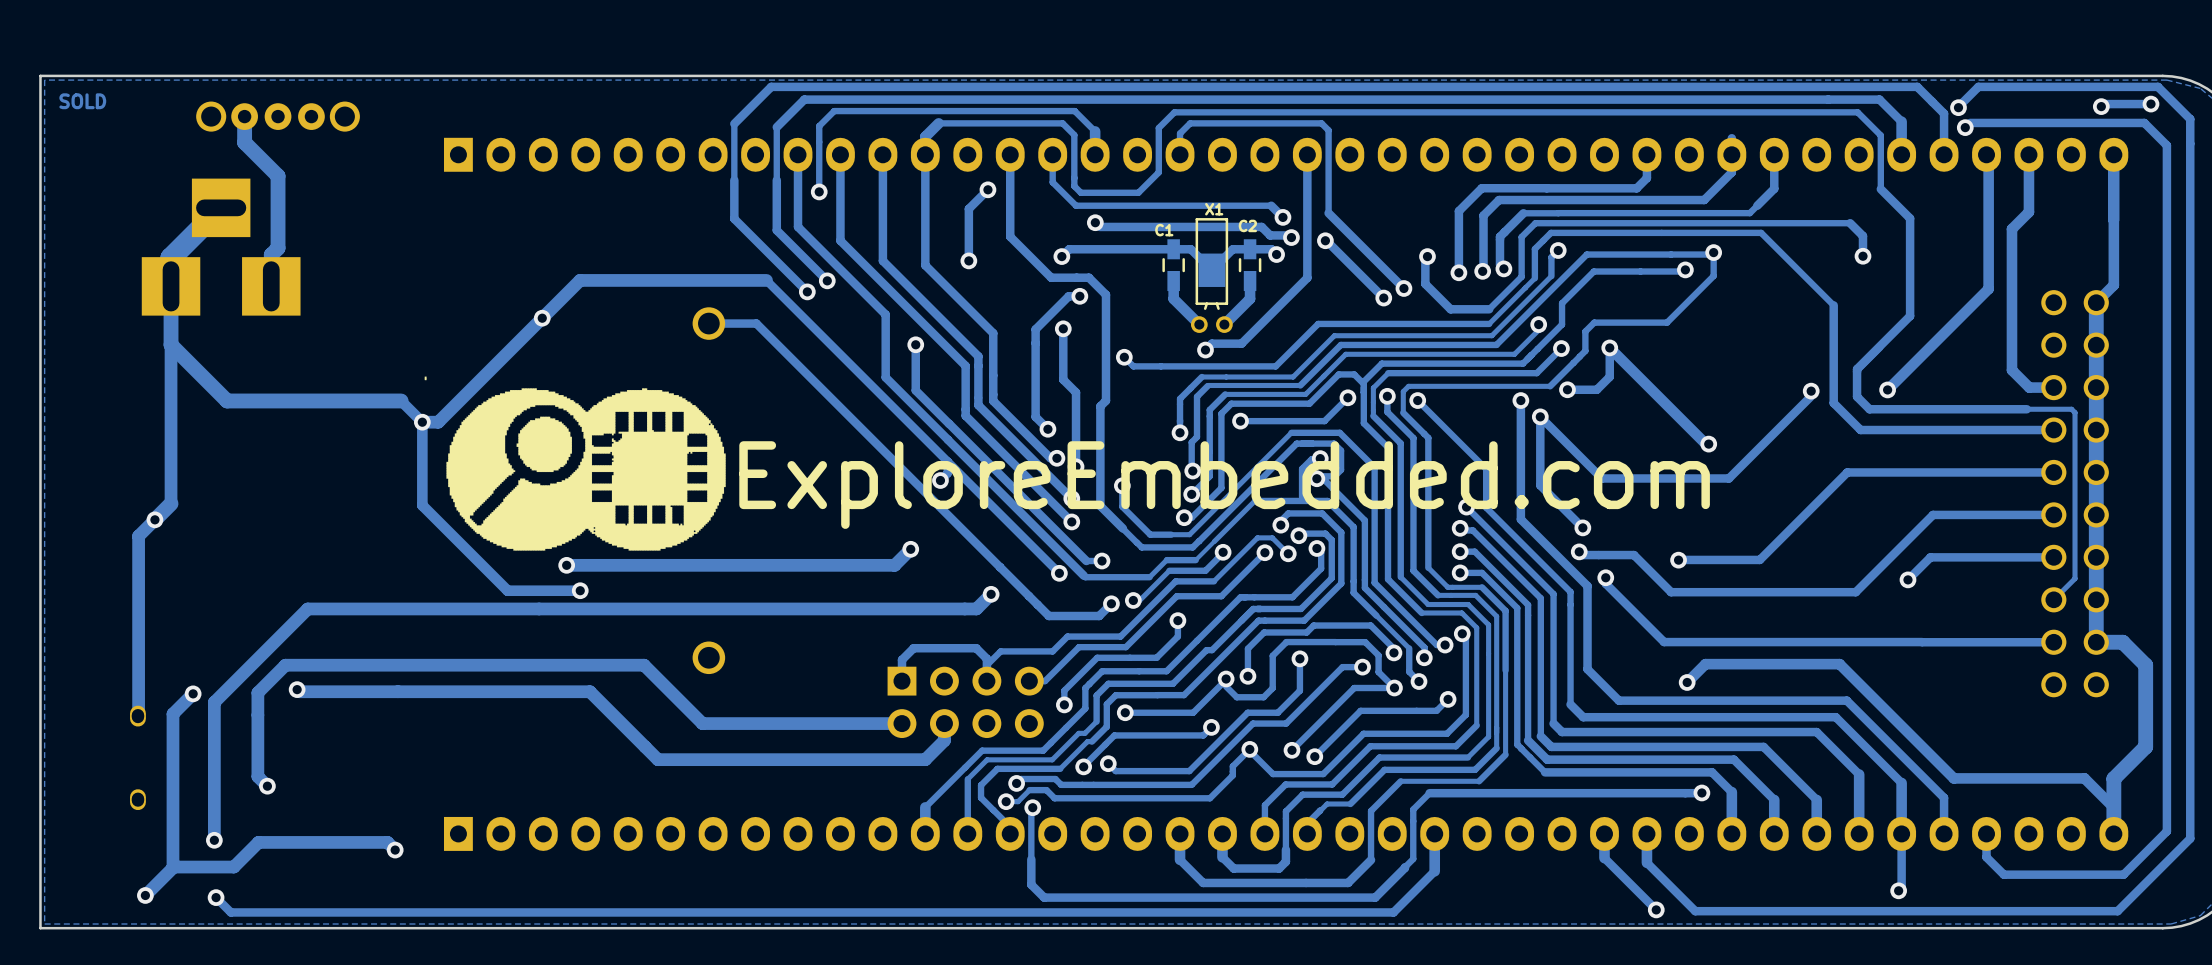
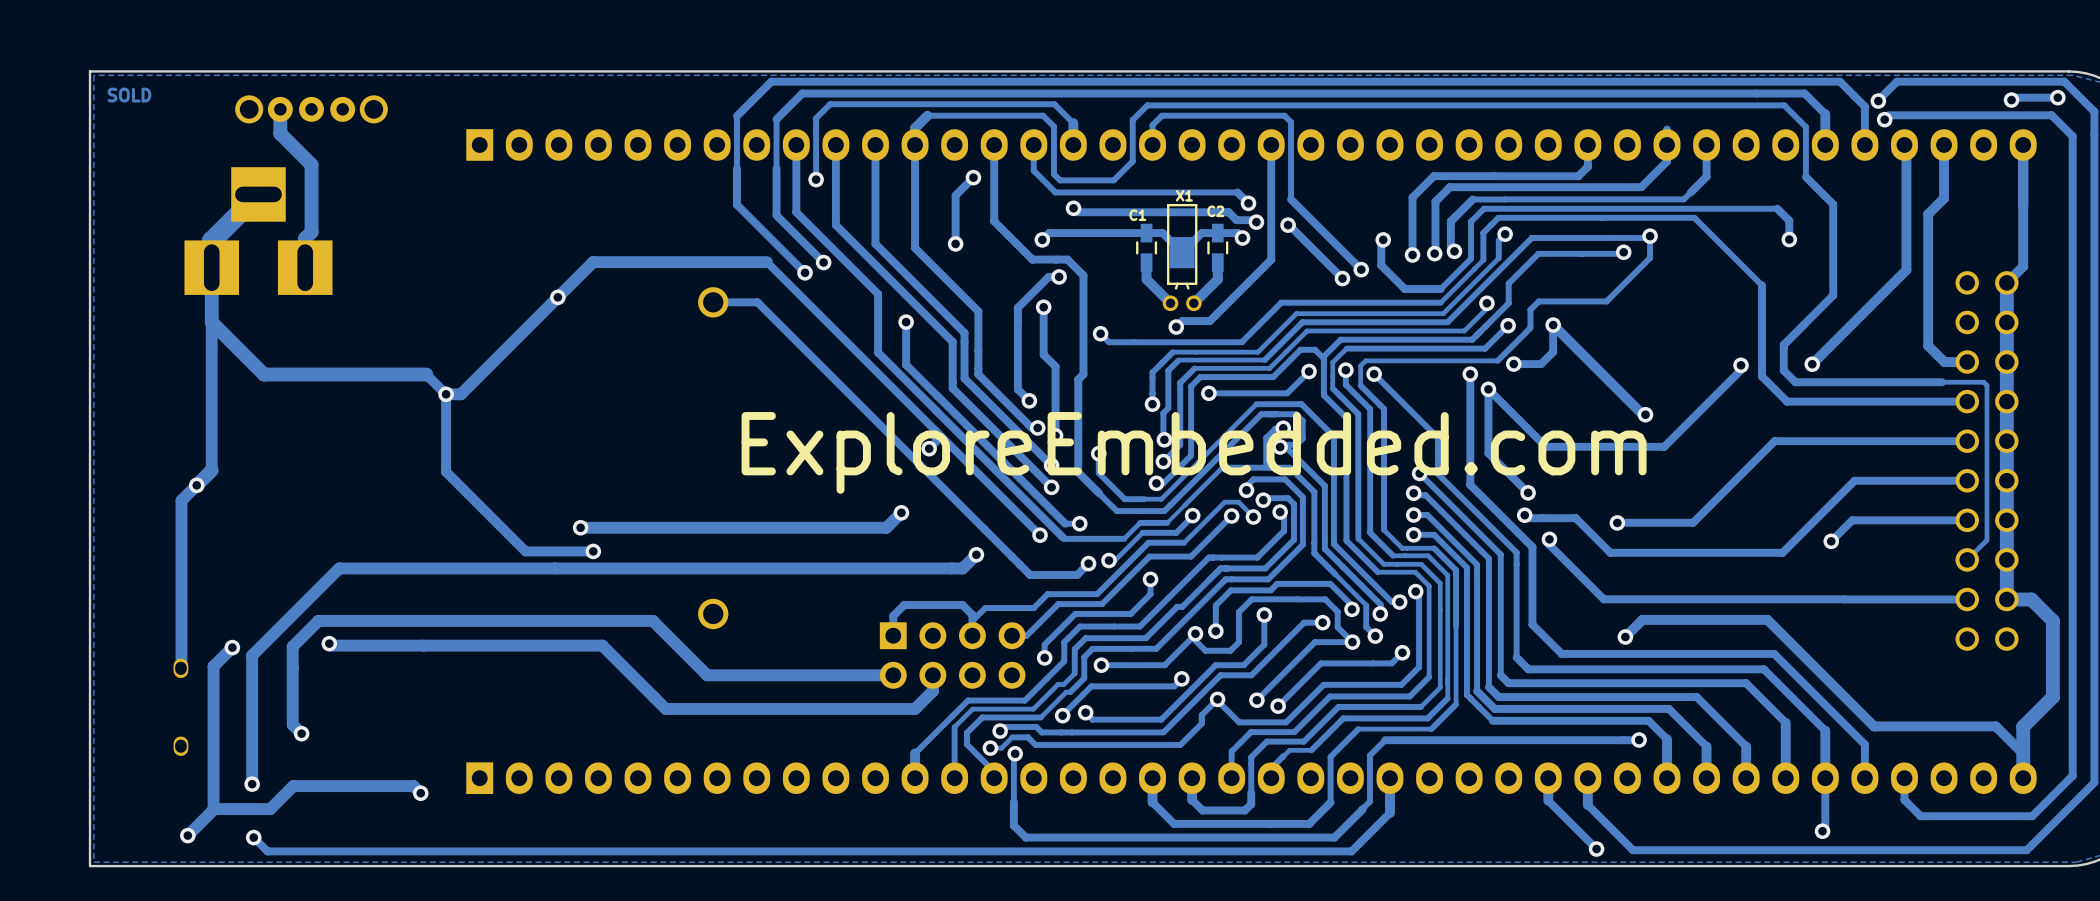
drawing: [424, 376, 726, 551] -> none

